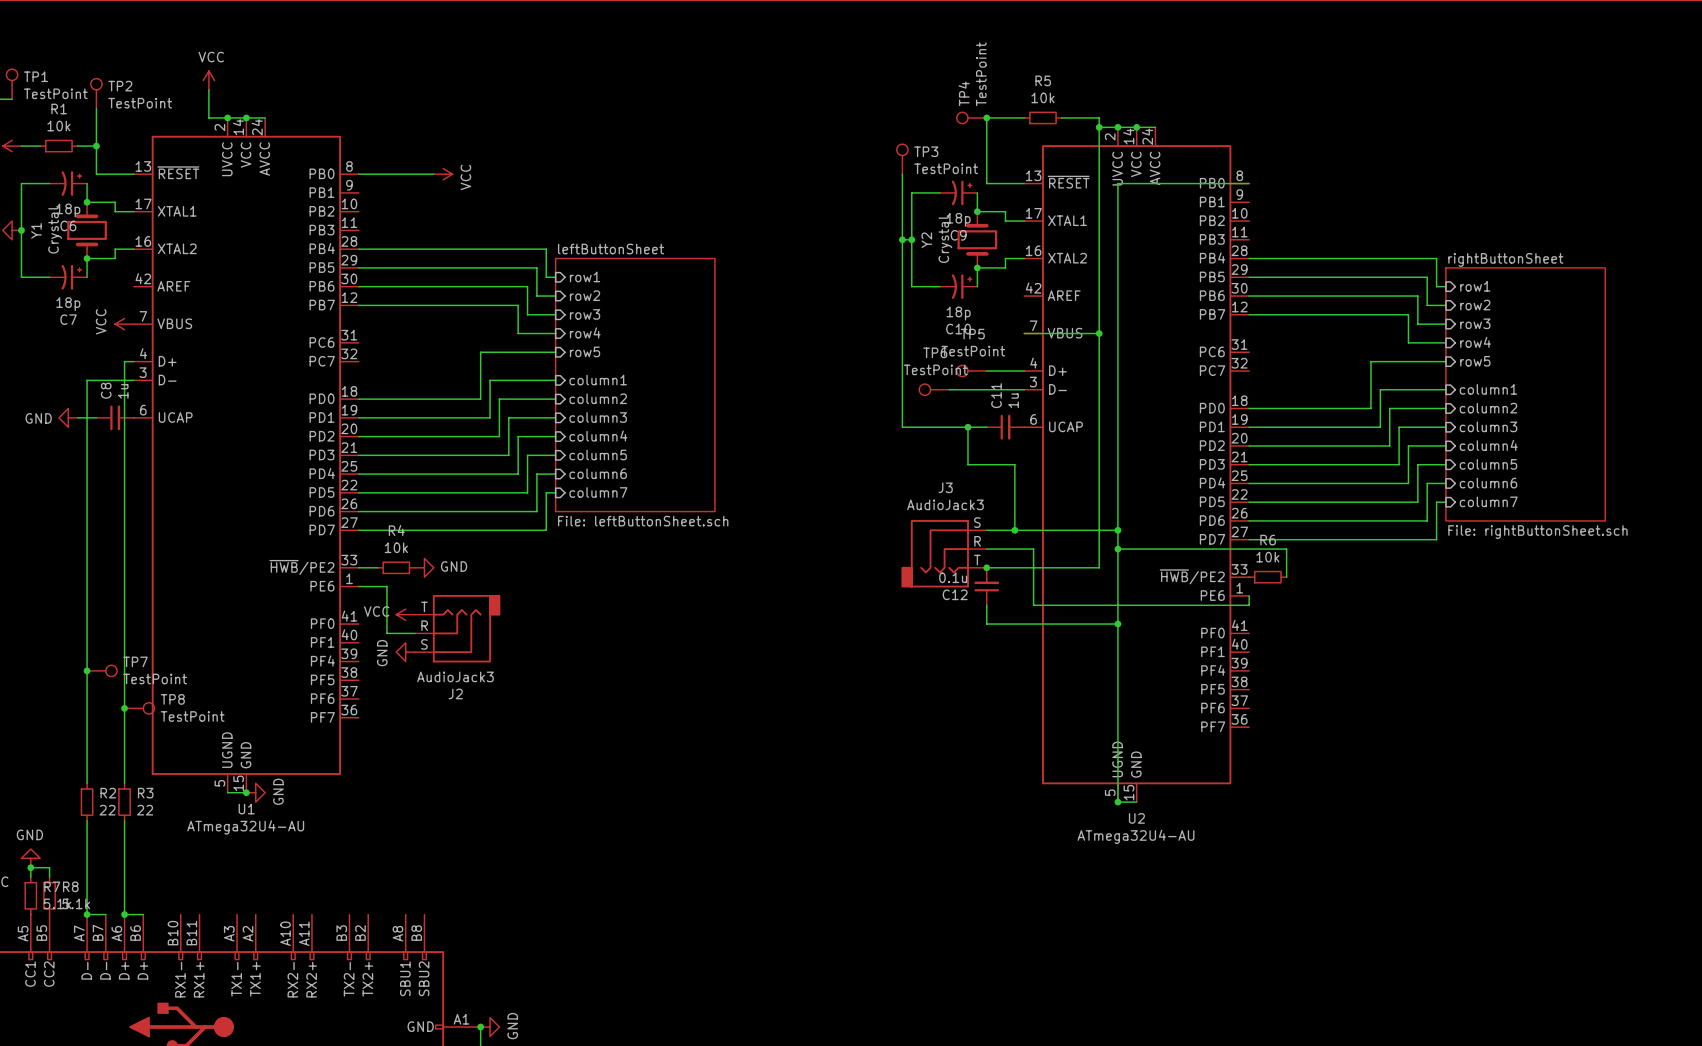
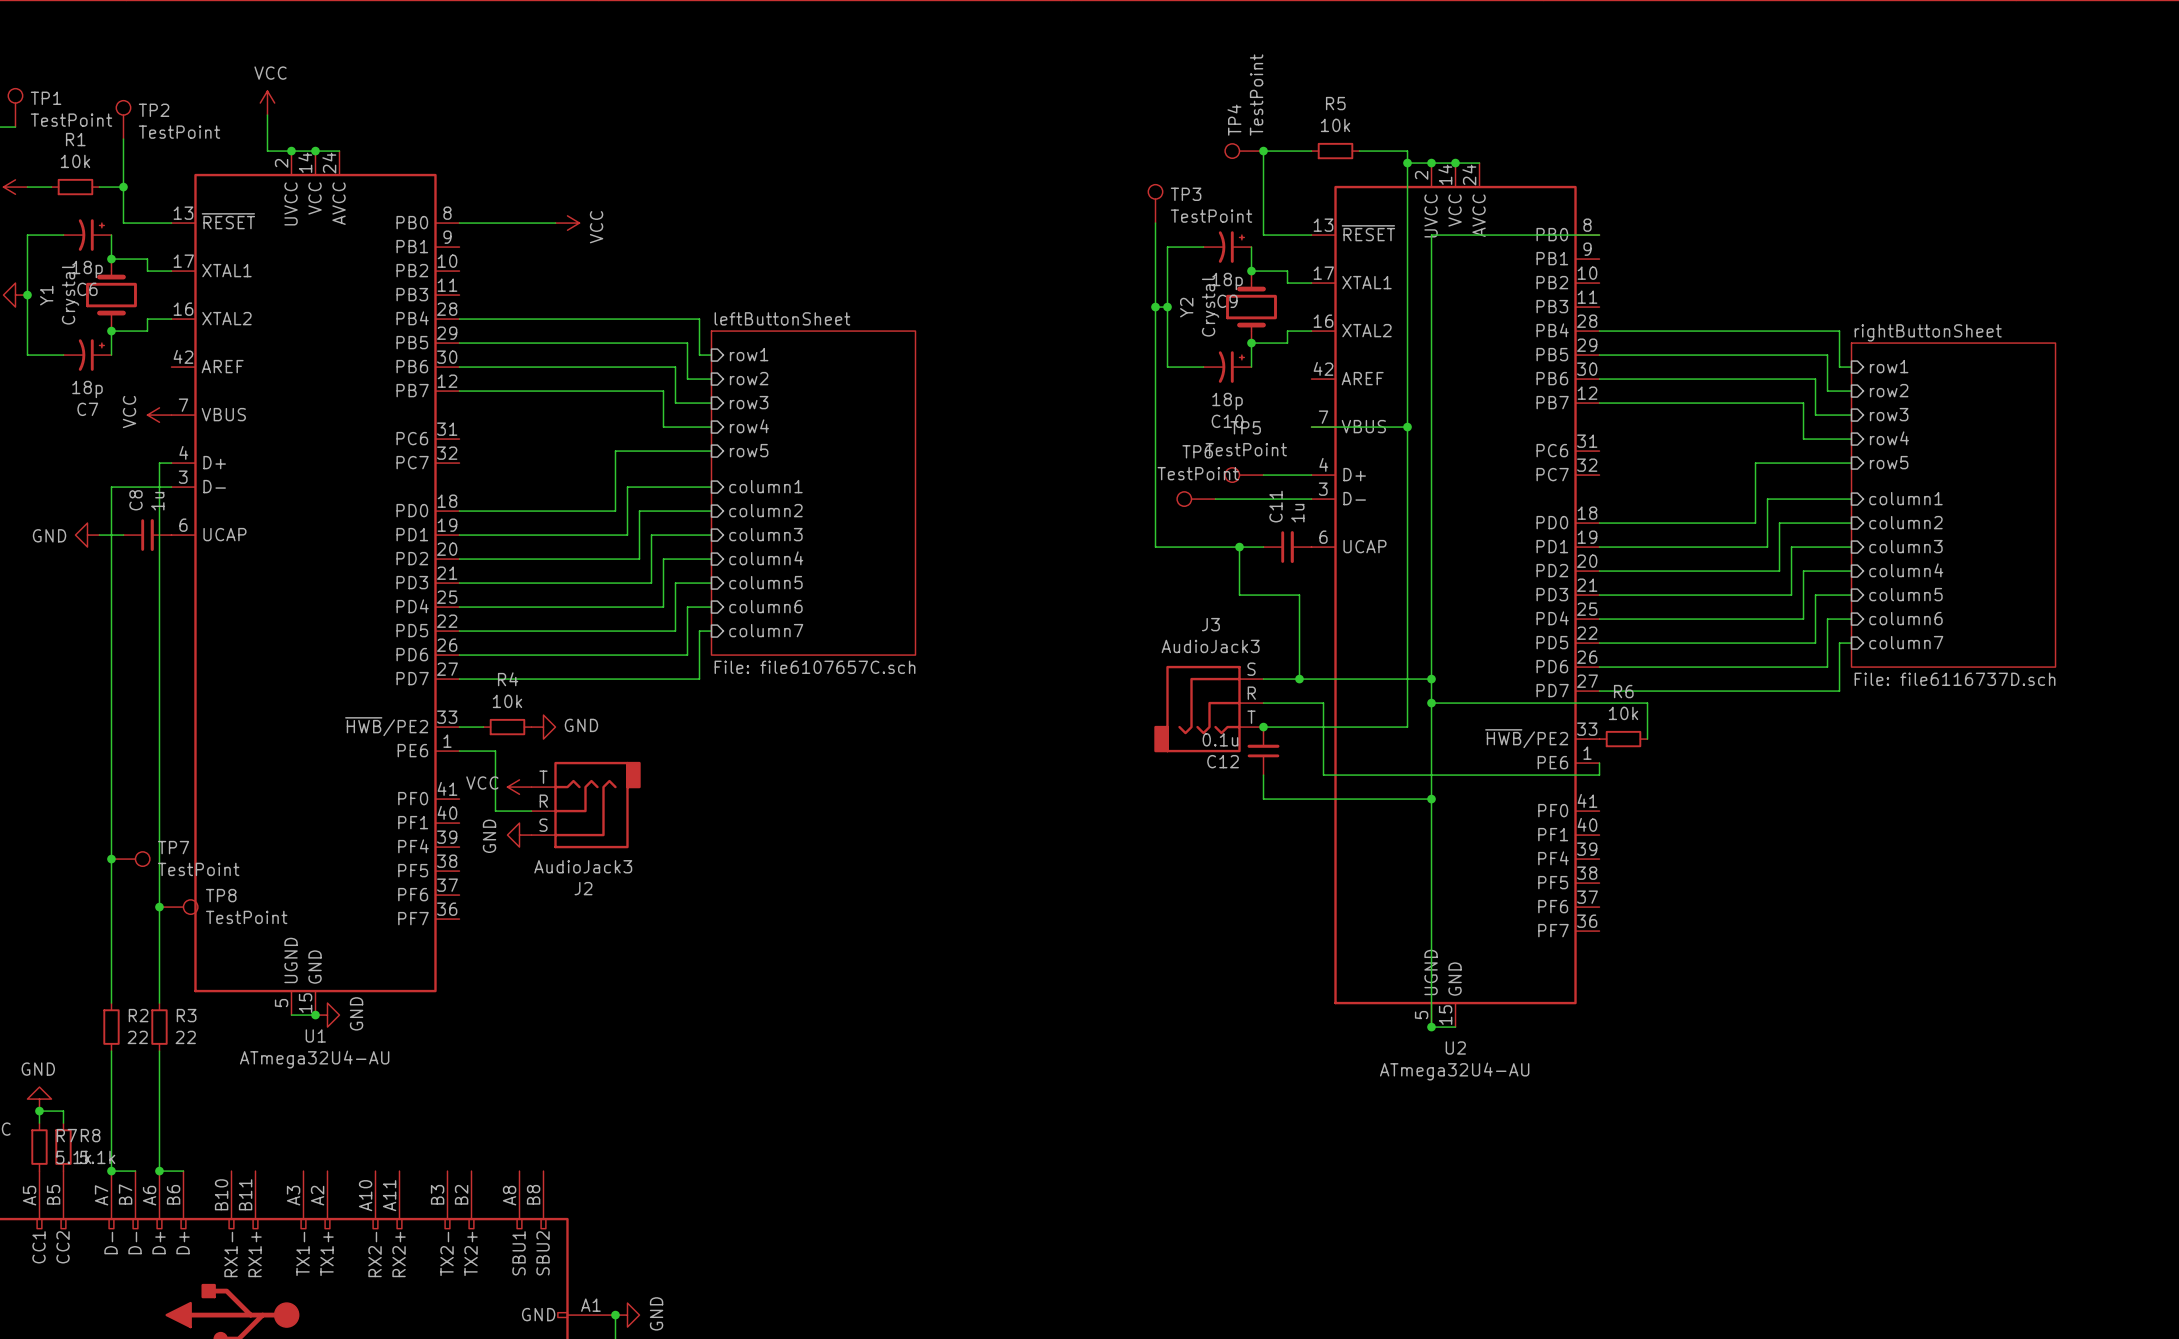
sheet leftButtonSheet value: File: leftButtonSheet.sch (643, 521) -> File: file6107657C.sch (815, 667)
sheet rightButtonSheet value: File: rightButtonSheet.sch (1537, 532) -> File: file6116737D.sch (1955, 679)

